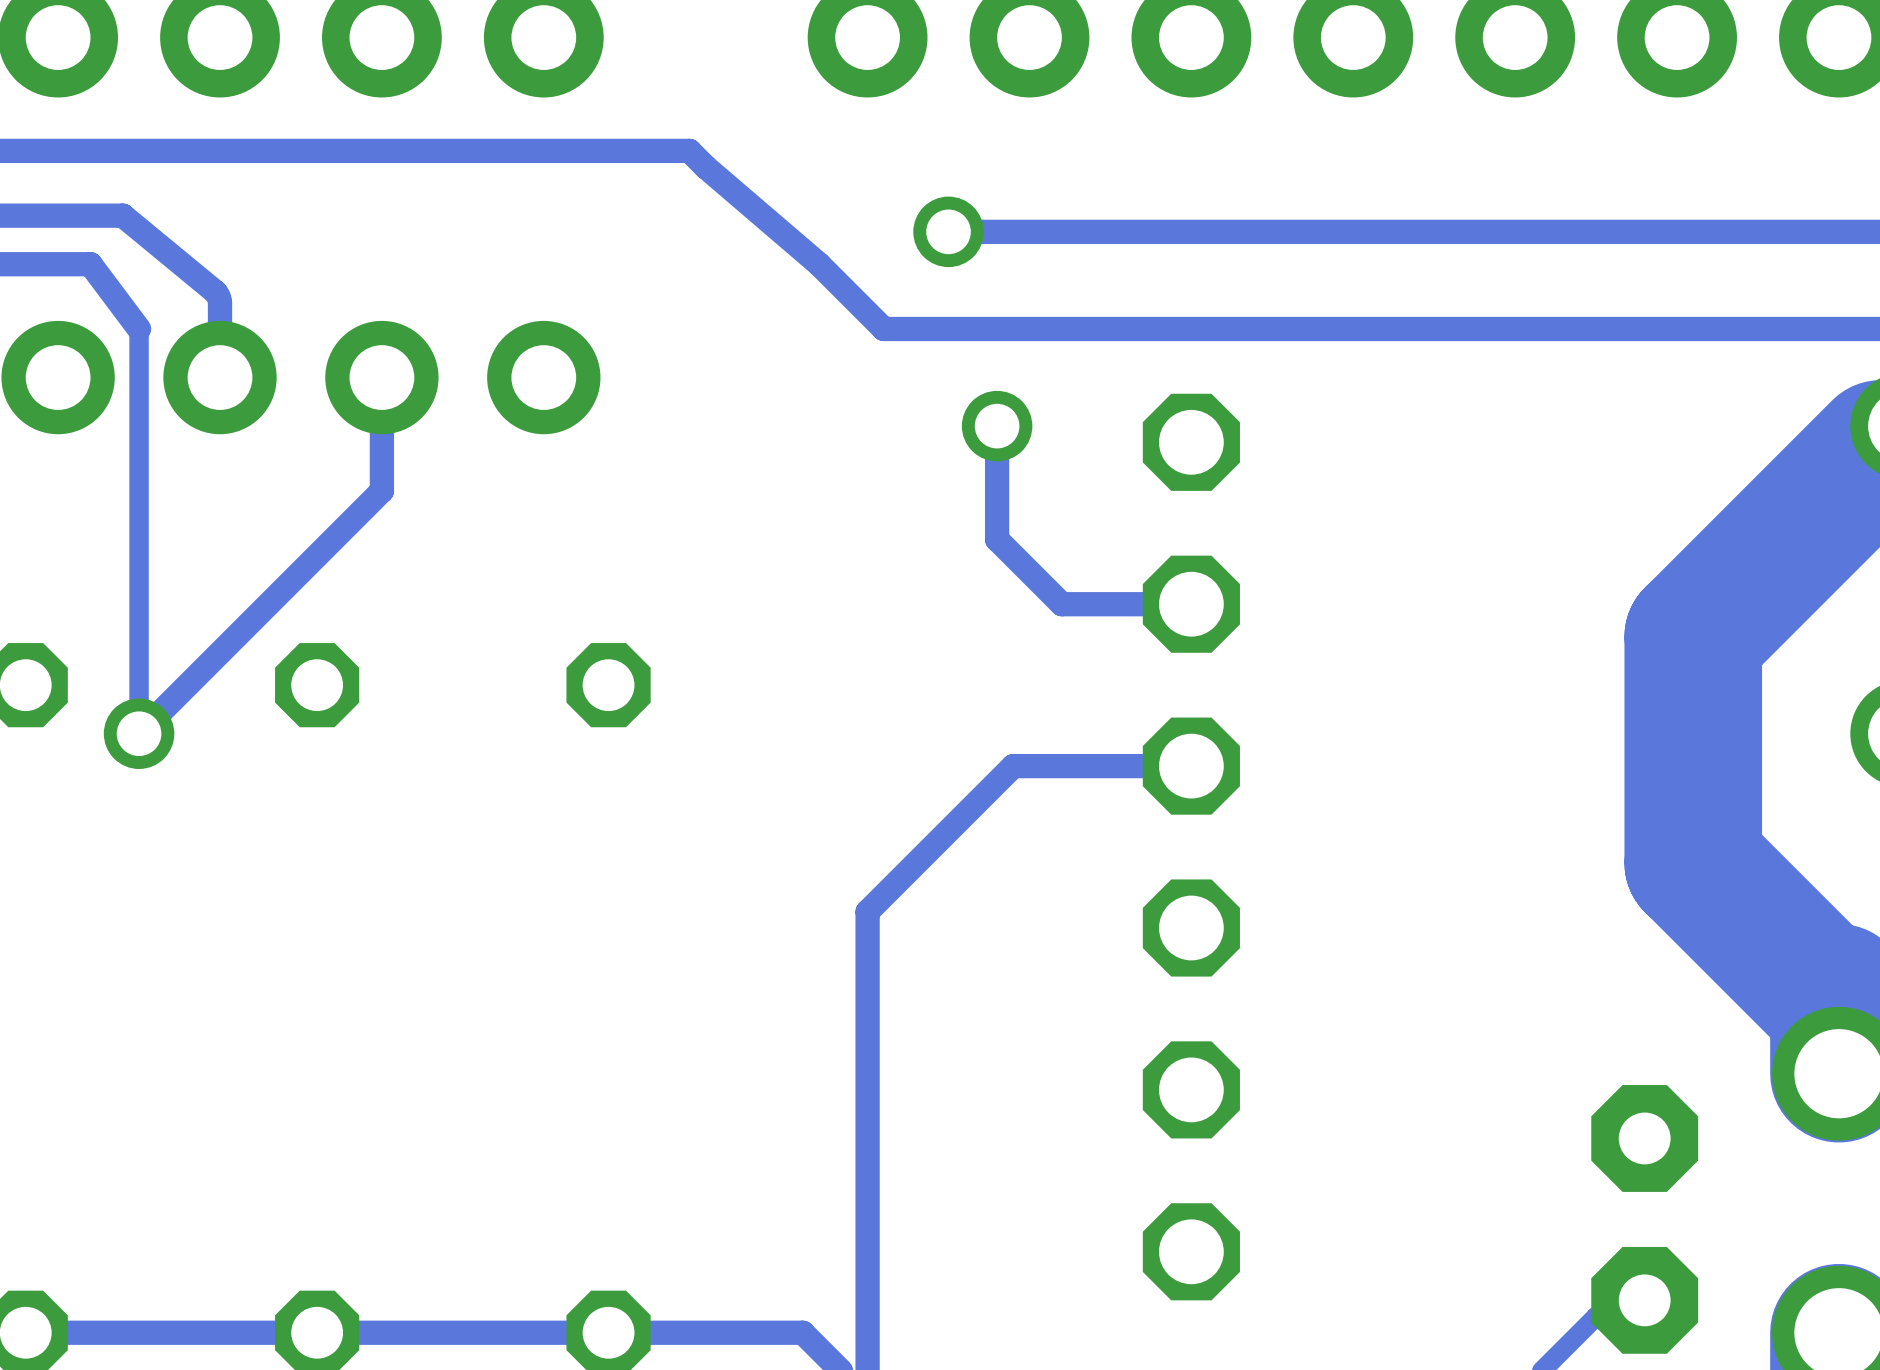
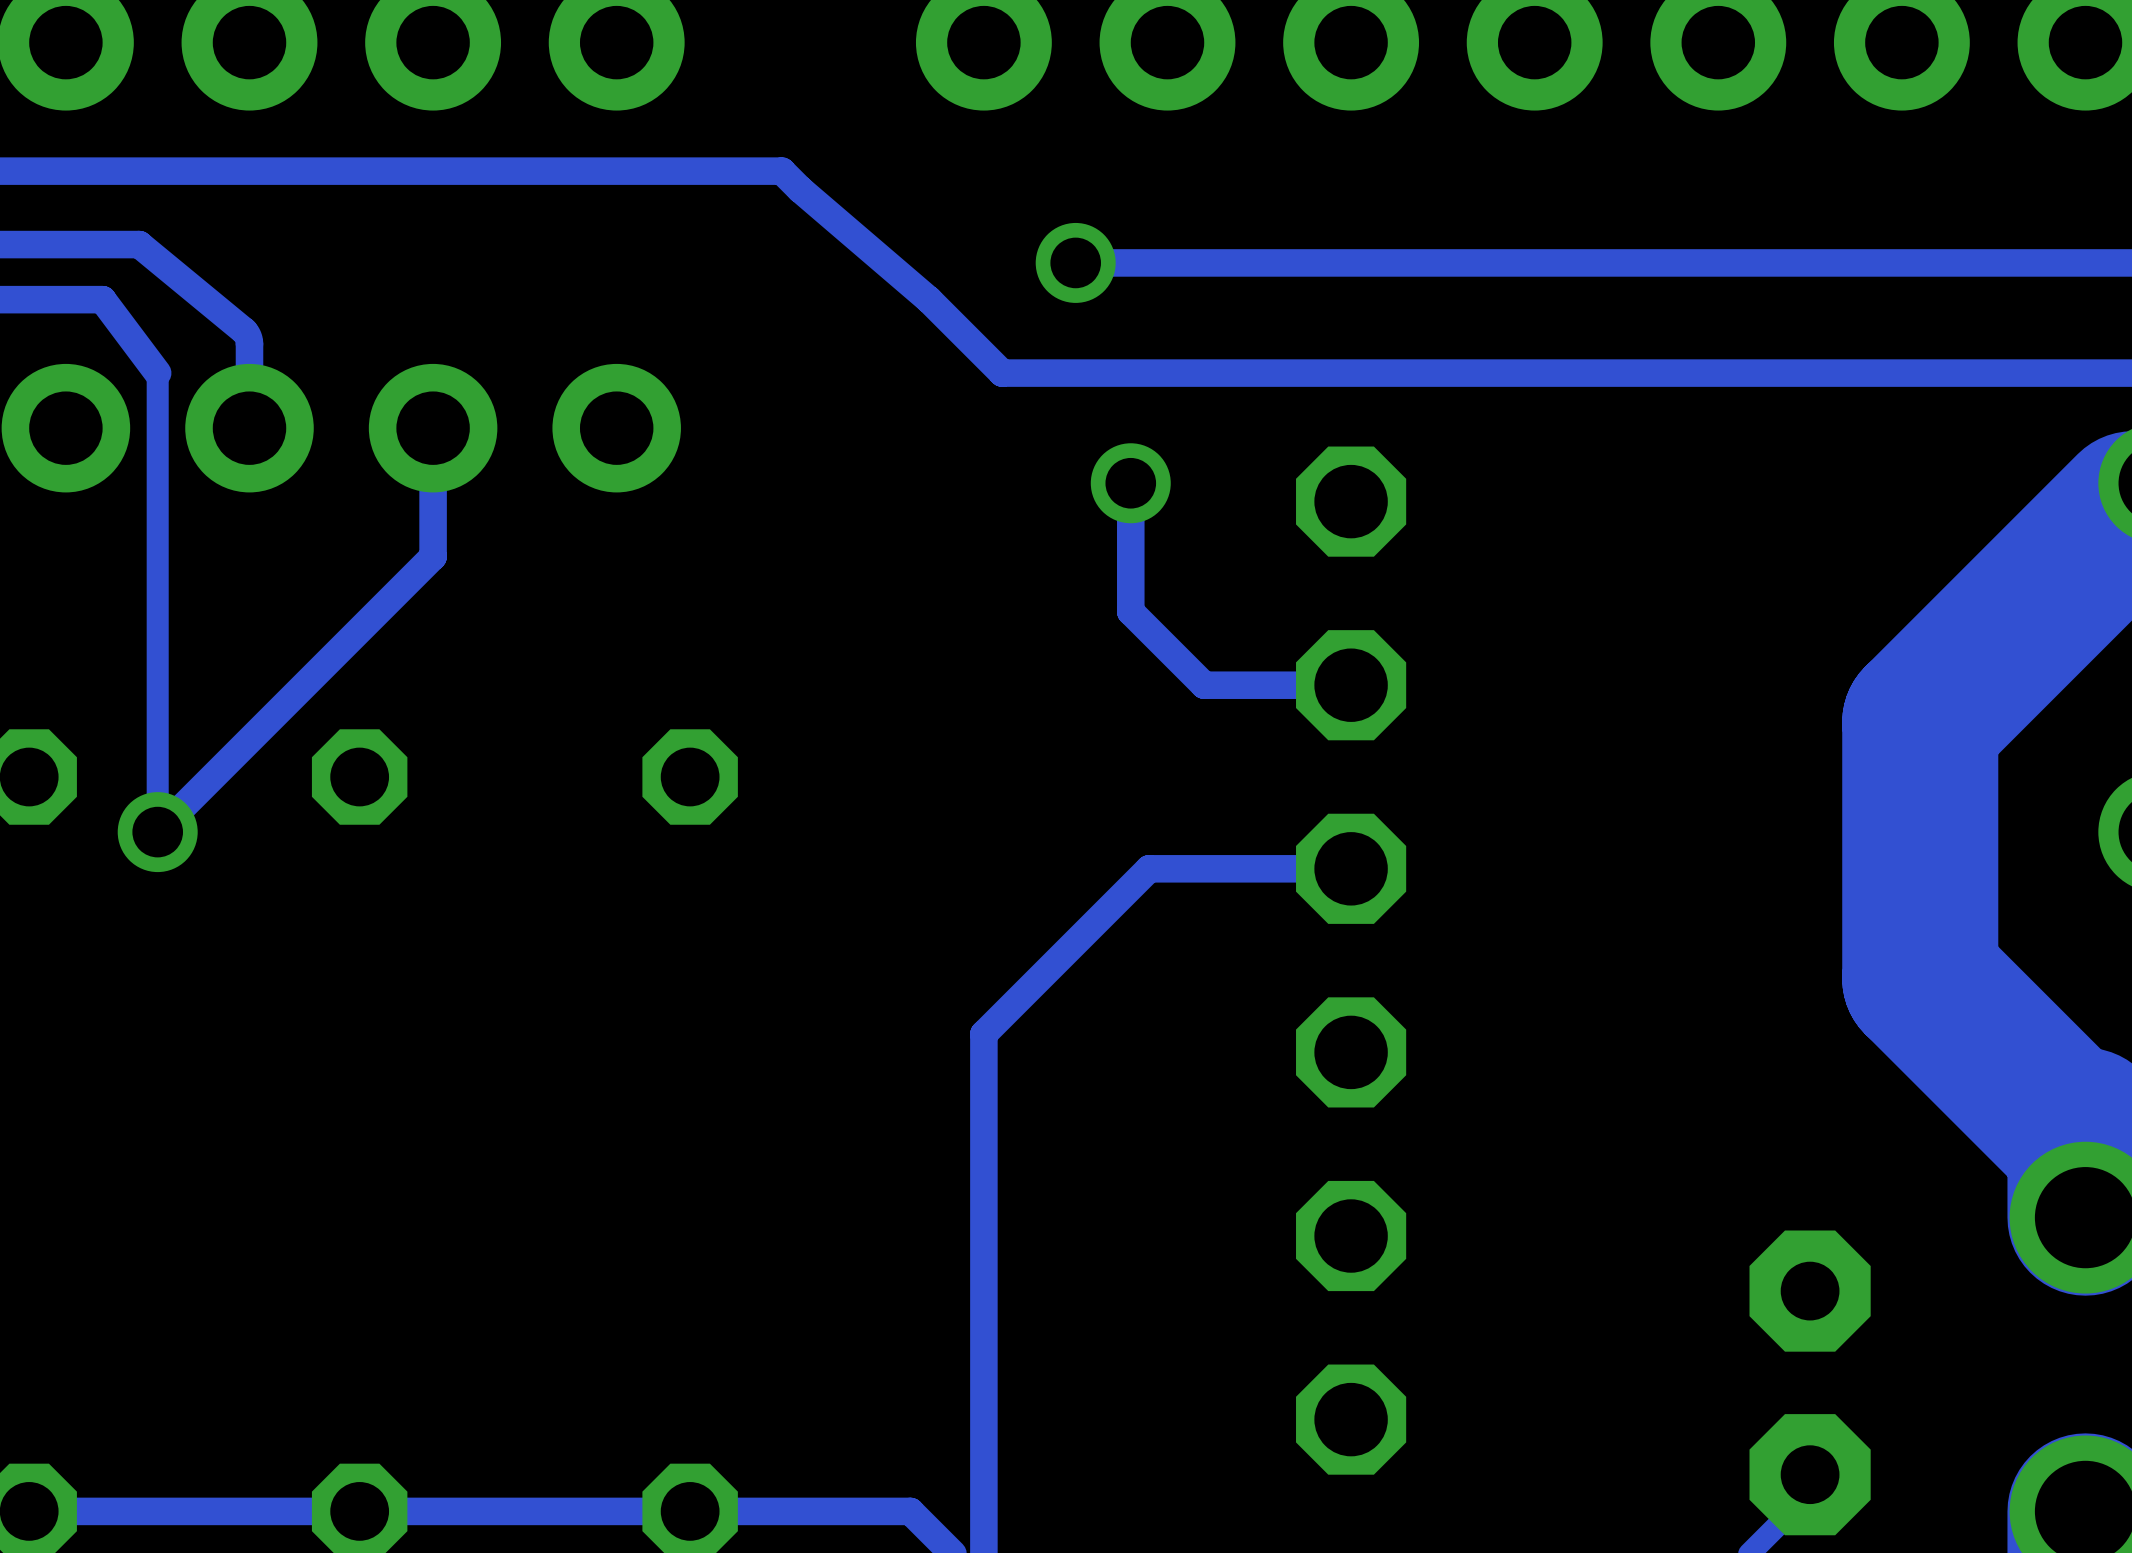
part position: (1644, 1219) -> (1810, 1382)

